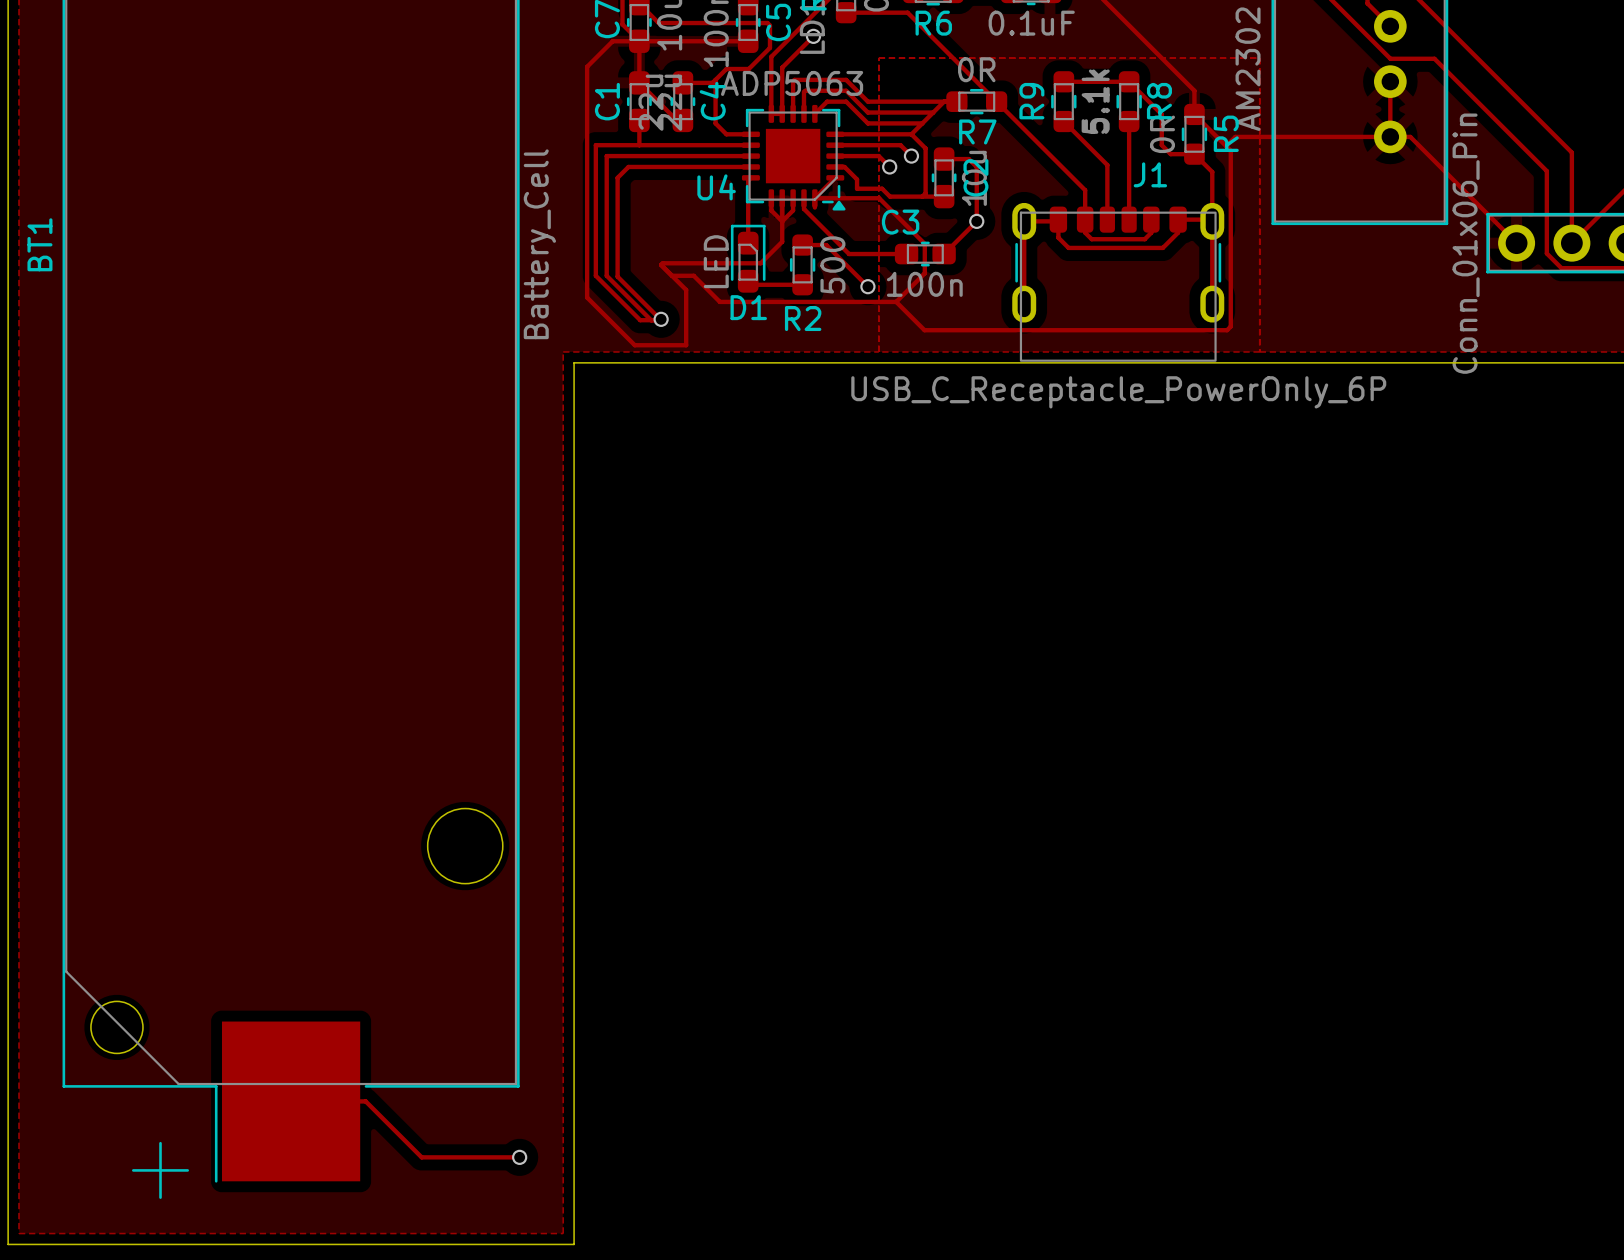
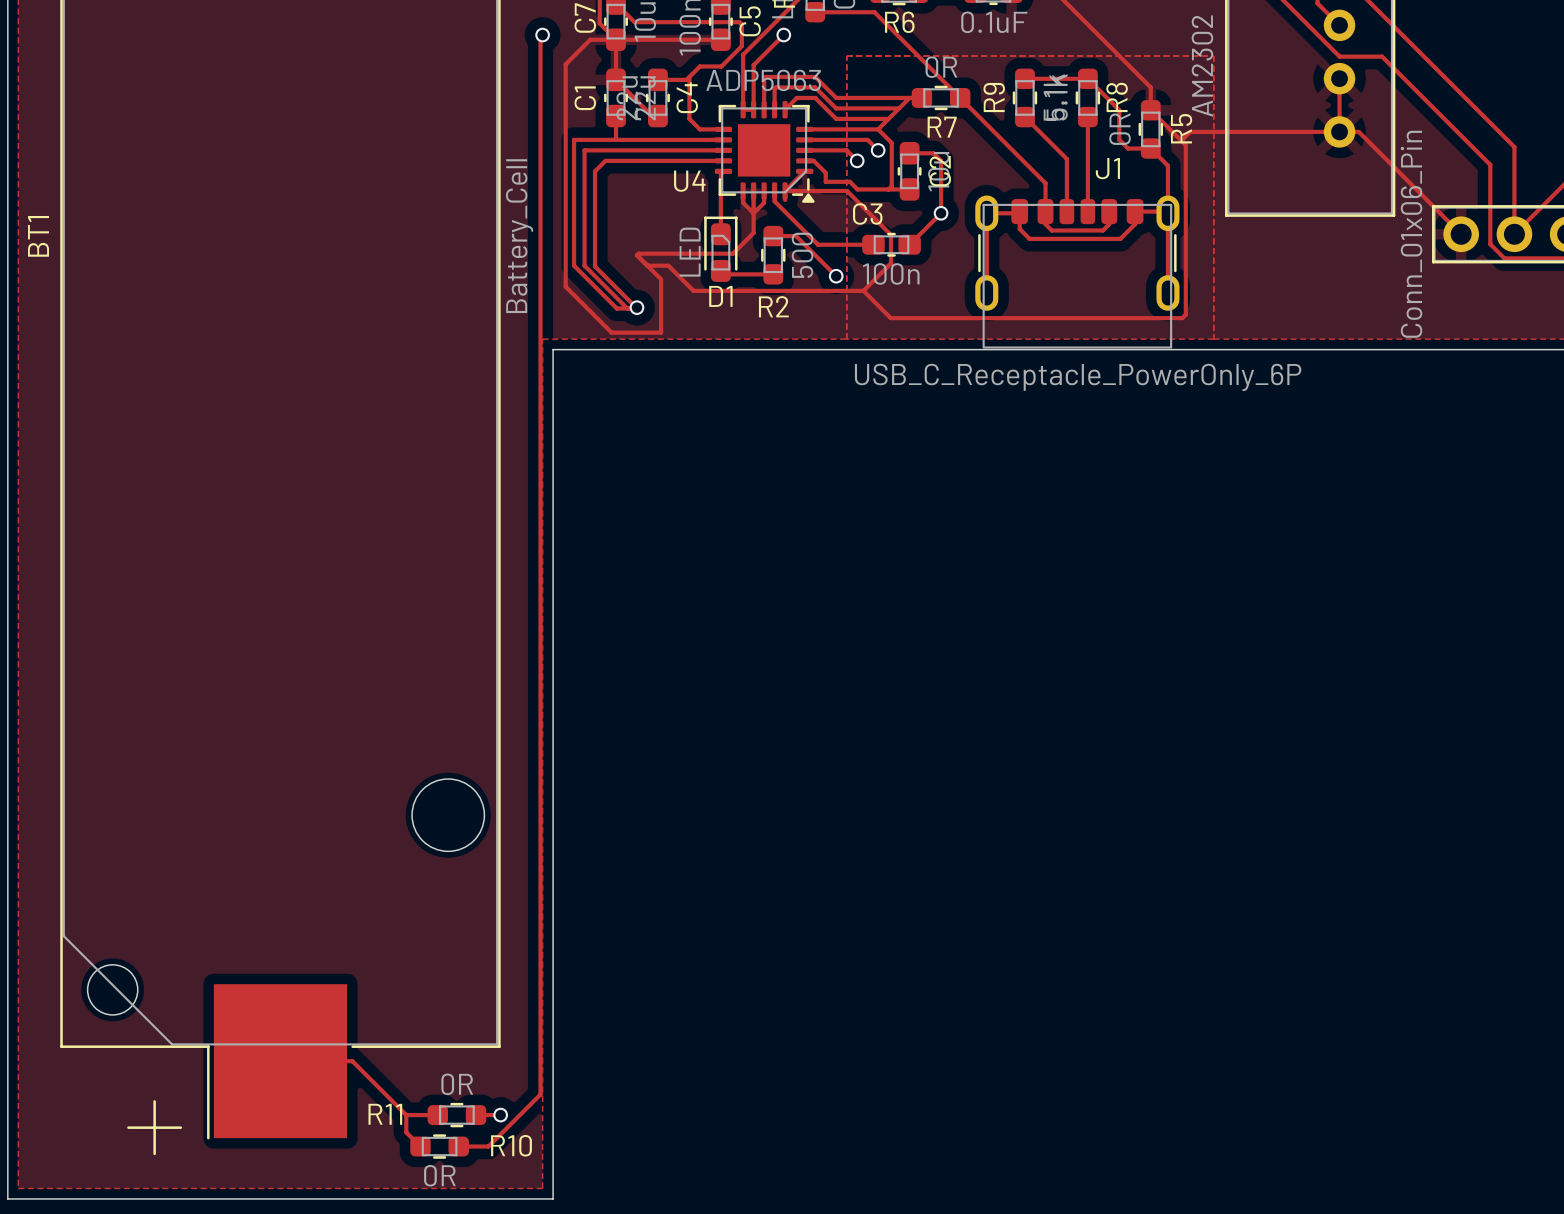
track: none -> (542, 35) (540, 37) (540, 1094) (488, 1146) (458, 1146)
via: none -> (542, 35)
track: none -> (406, 1115) (406, 1132) (420, 1146)
track: (454, 1157) (494, 1157) -> none
R11: none -> 0R (456, 1115)
R10: none -> 0R (439, 1146)

